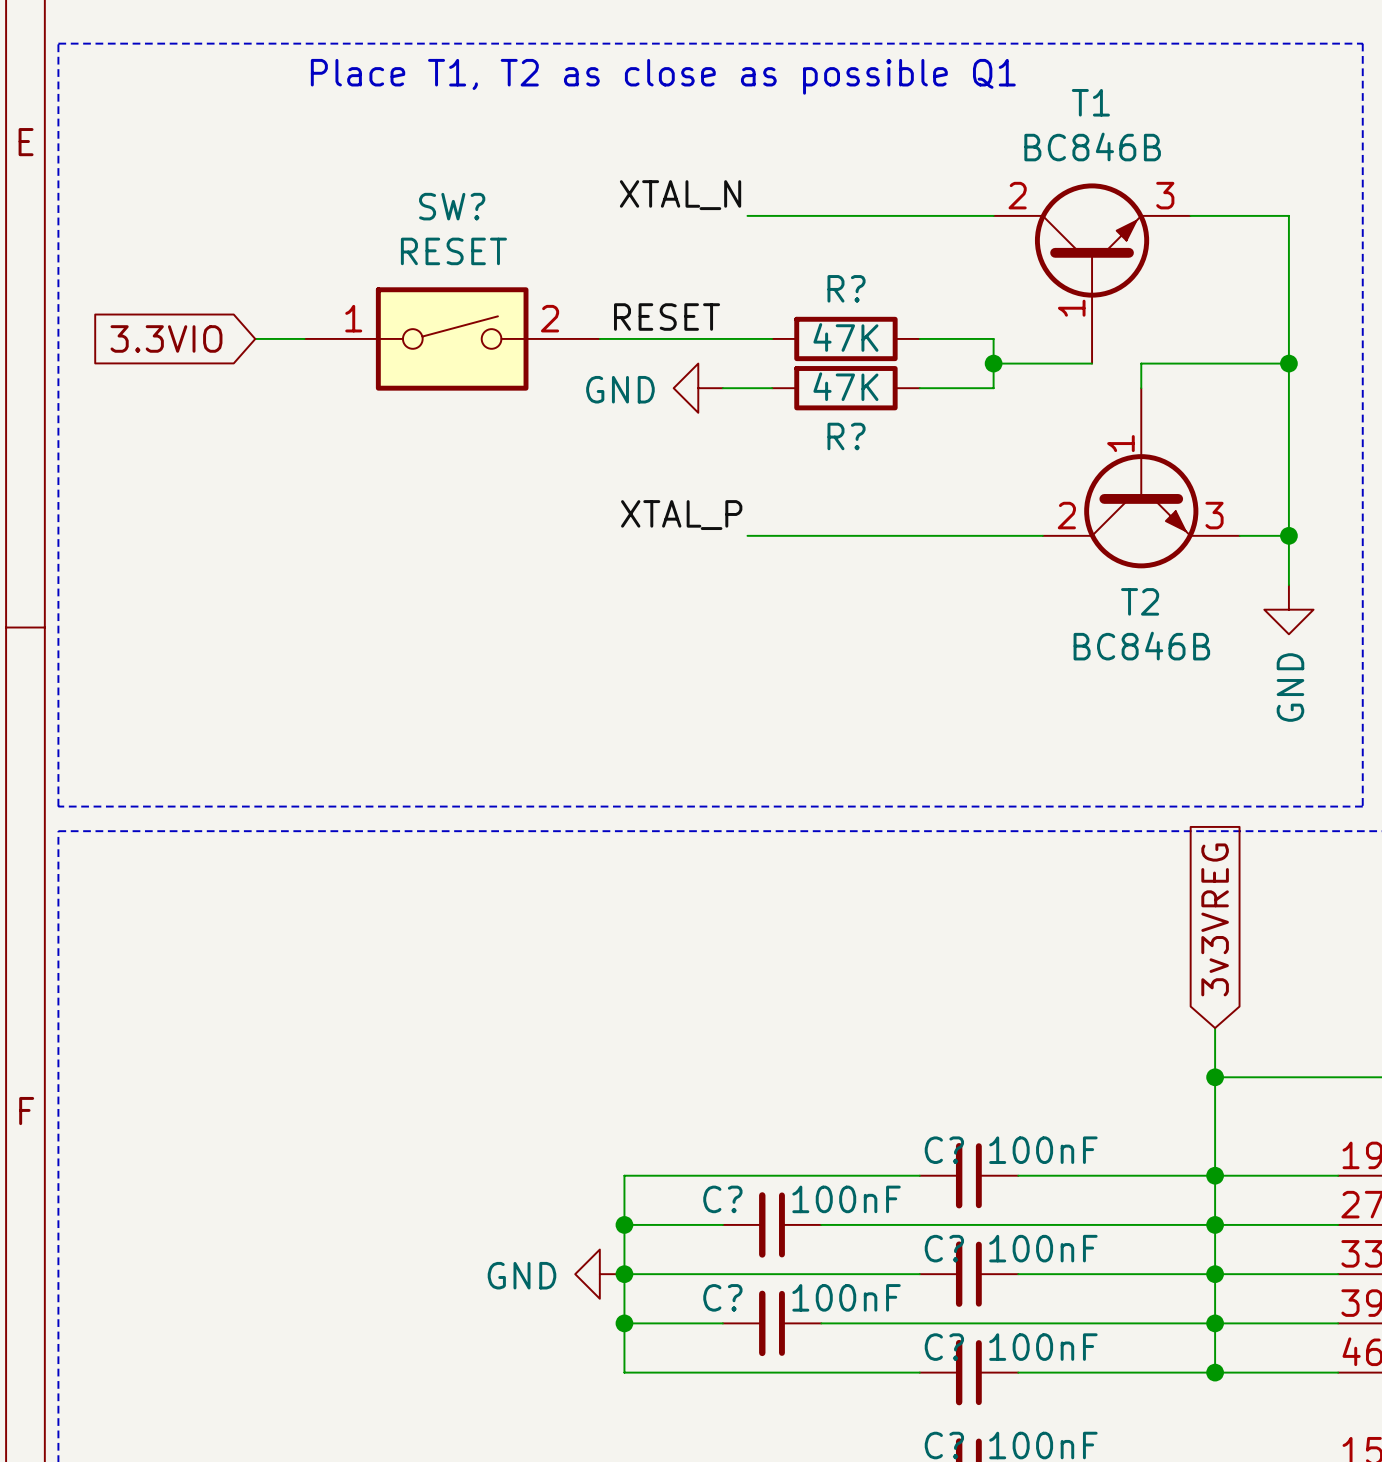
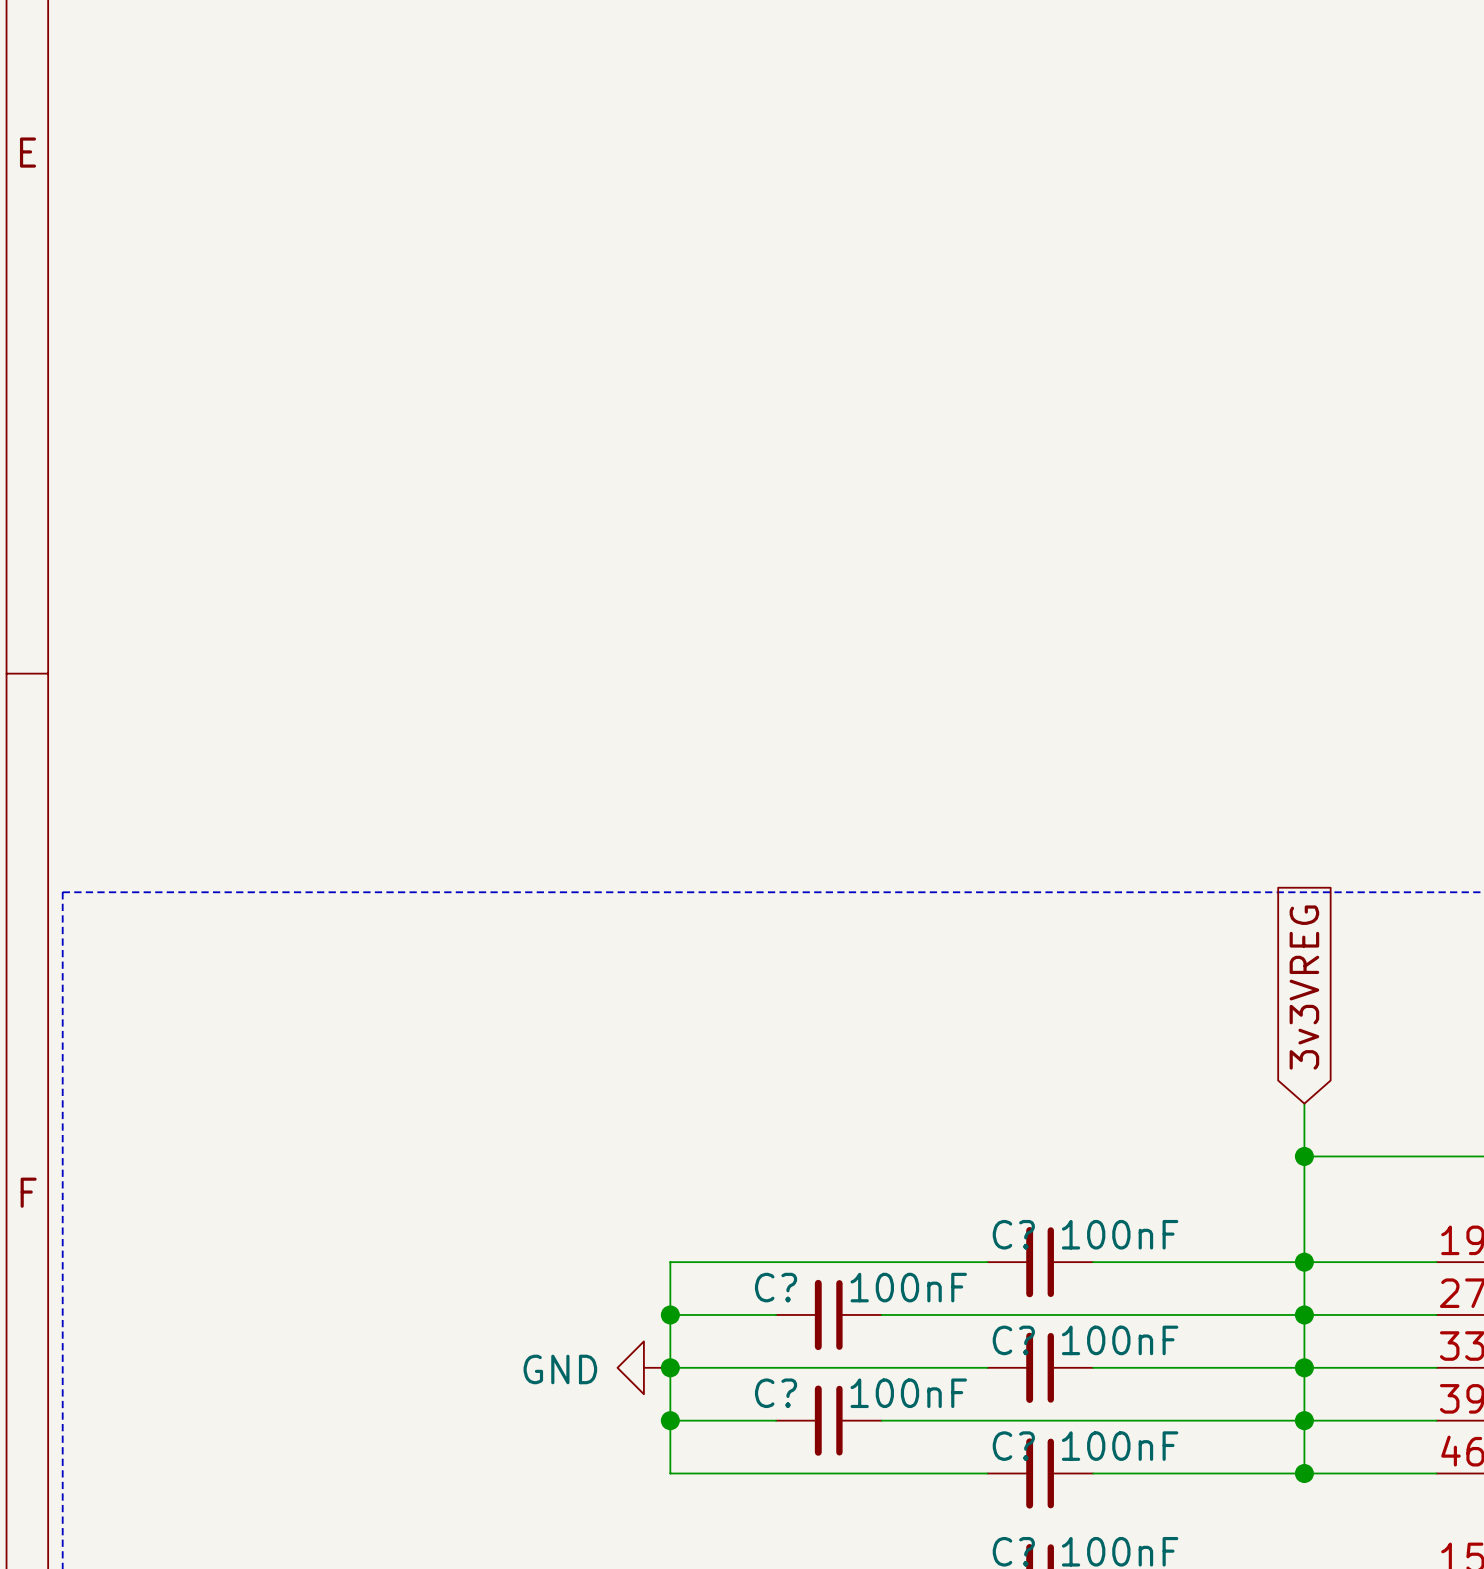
line: (58, 43) (1362, 43) (1362, 806) (58, 806) (58, 43) -> none
text: Place T1, T2 as close as possible Q1 (663, 76) -> none
label: XTAL_N (680, 195) -> none
wire: (747, 215) (993, 215) -> none
wire: (1190, 215) (1288, 215) (1288, 585) -> none
T1: BC846B (1092, 273) -> none
label: RESET (667, 317) -> none
global label: 3.3VIO (166, 338) -> none
wire: (255, 338) (304, 338) -> none
SW?: RESET (452, 338) -> none
wire: (599, 338) (772, 338) -> none
R?: 47K (845, 338) -> none
wire: (919, 338) (993, 338) (993, 388) (919, 388) -> none
wire: (993, 363) (1092, 363) -> none
junction: (993, 363) -> none
wire: (1288, 363) (1141, 363) (1141, 388) -> none
junction: (1288, 363) -> none
power symbol: GND (698, 388) -> none
wire: (722, 388) (772, 388) -> none
R?: 47K (845, 388) -> none
T2: BC846B (1141, 478) -> none
label: XTAL_P (681, 515) -> none
wire: (747, 535) (1042, 535) -> none
wire: (1239, 535) (1288, 535) -> none
junction: (1288, 535) -> none
power symbol: GND (1288, 609) -> none

